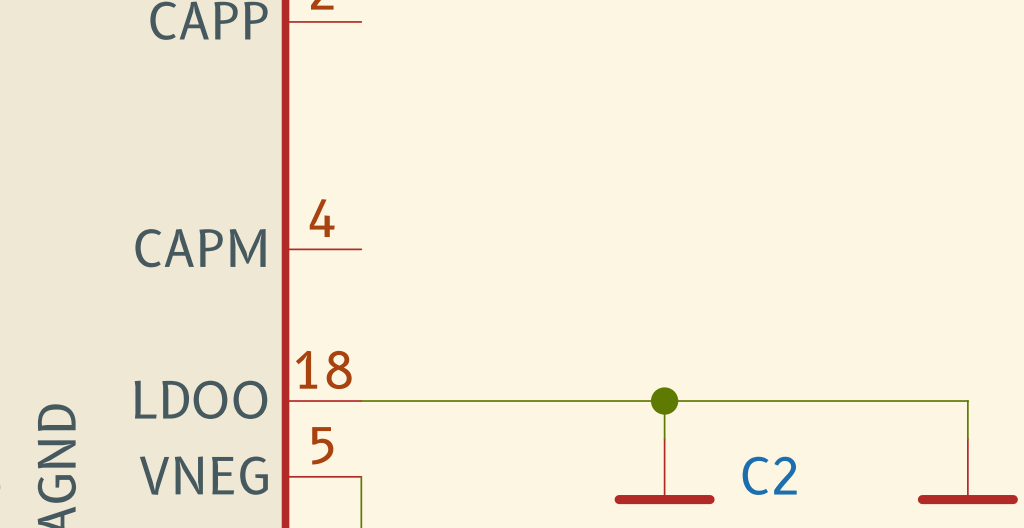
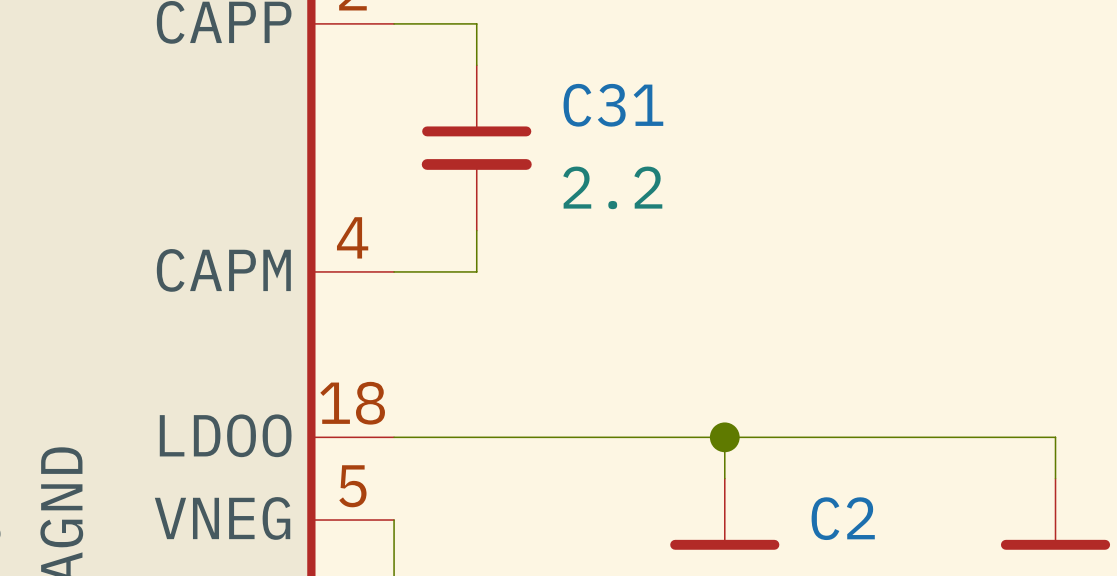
wire: none -> (394, 23) (476, 23) (476, 65)
C31: none -> 2.2 (476, 147)
wire: none -> (476, 230) (476, 271) (394, 271)

